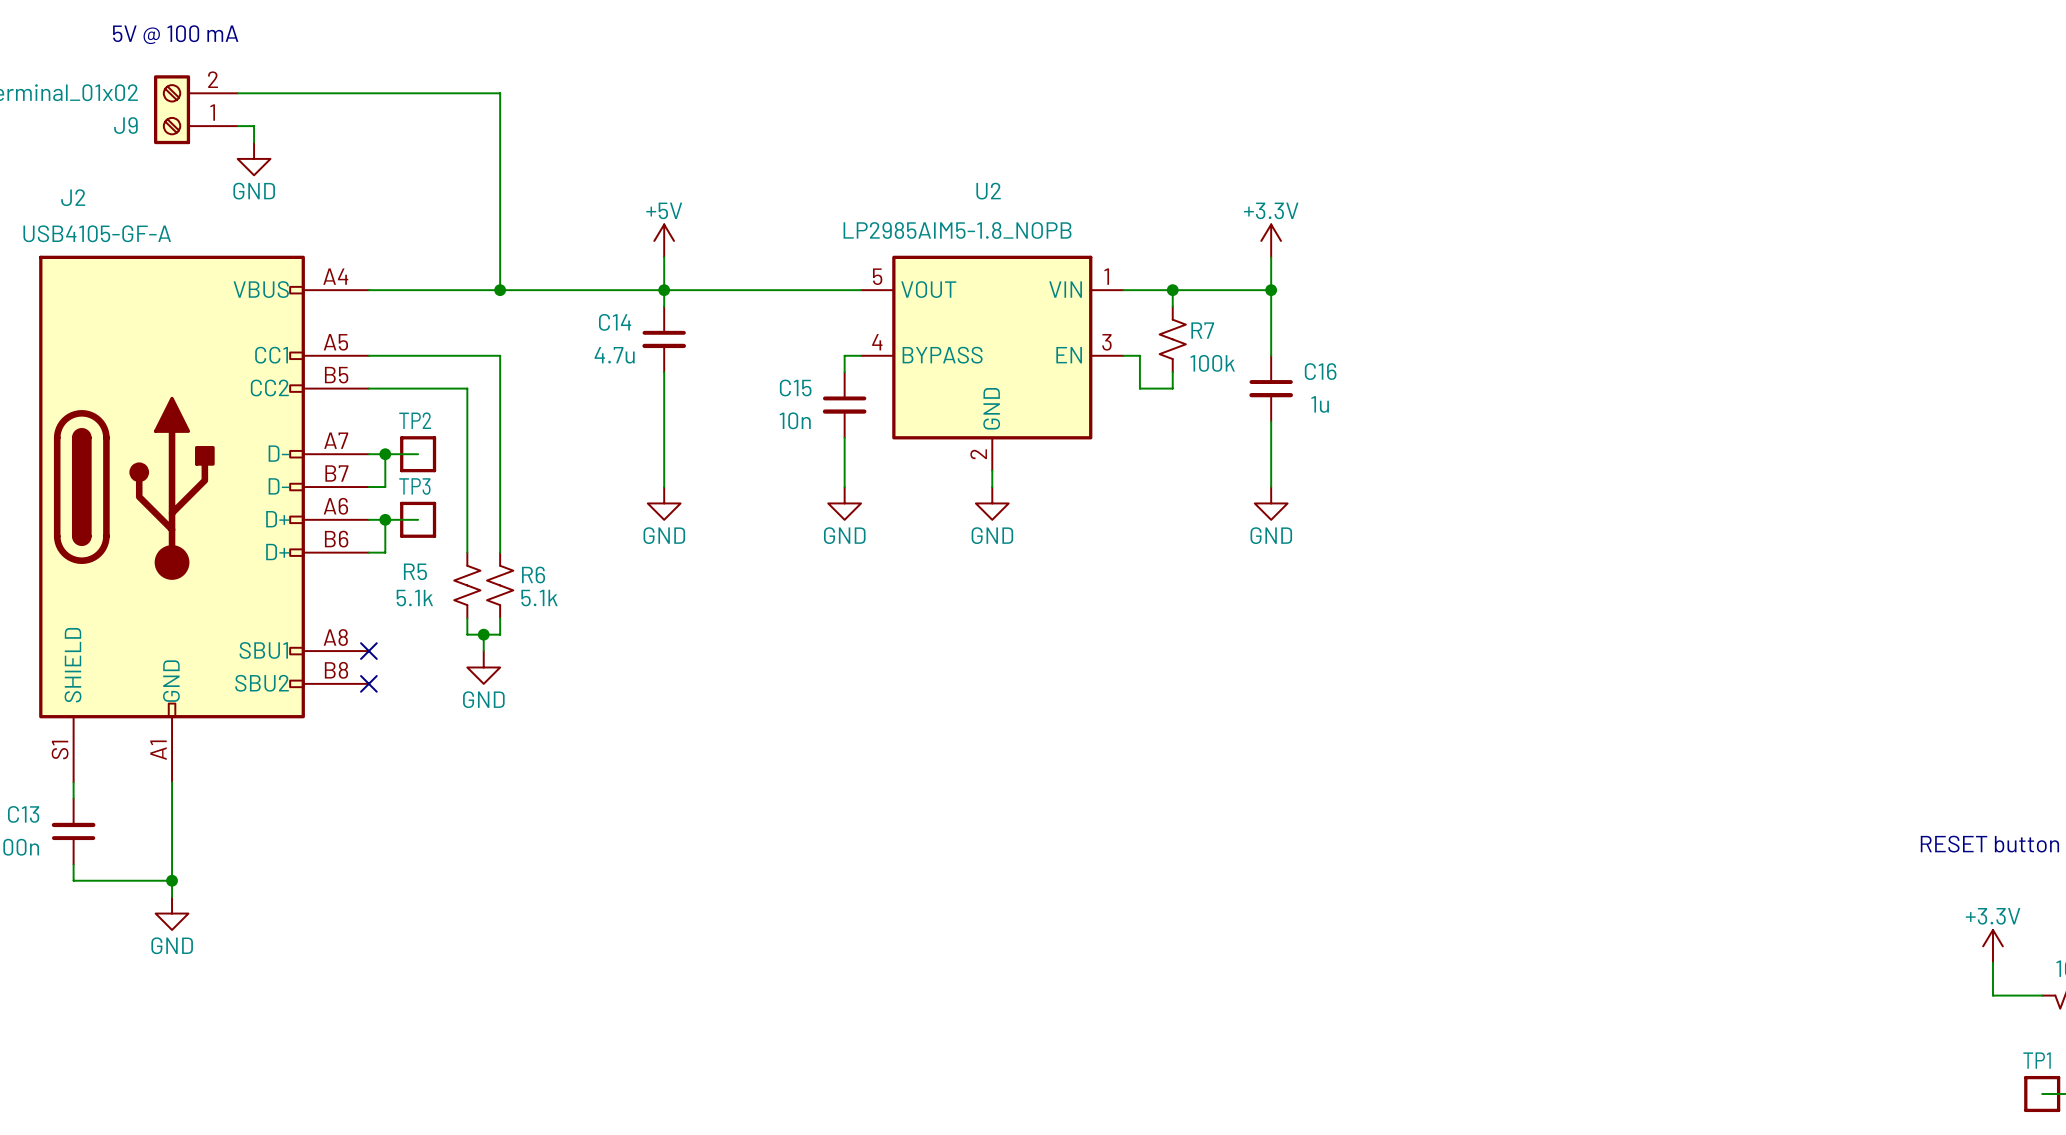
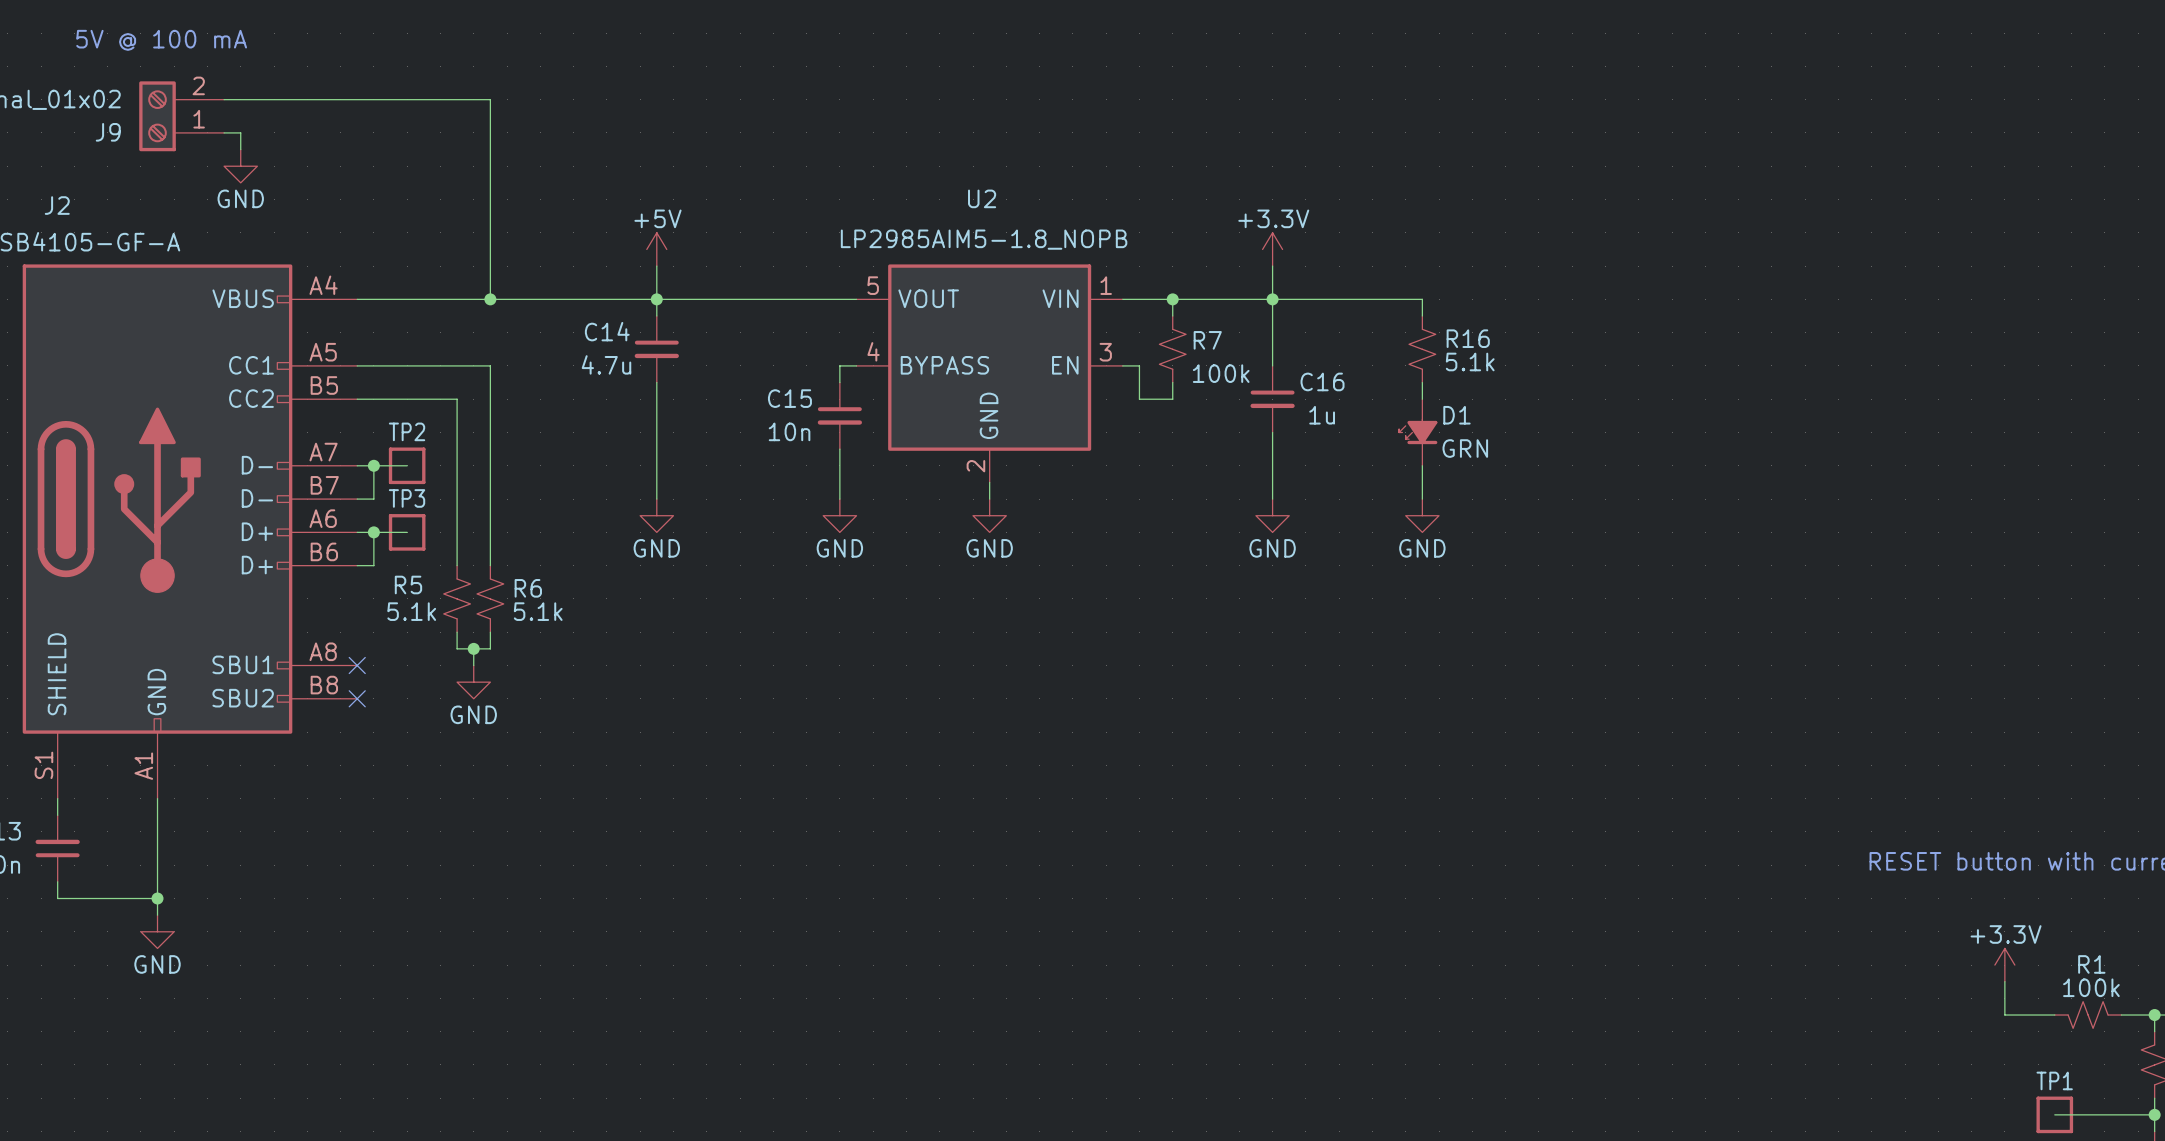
wire: none -> (1272, 299) (1422, 299) (1422, 316)
R16: none -> 5.1k (1422, 349)
wire: none -> (1422, 382) (1422, 399)
D1: none -> GRN (1418, 432)
wire: none -> (1422, 465) (1422, 499)
power symbol: none -> GND (1422, 515)

